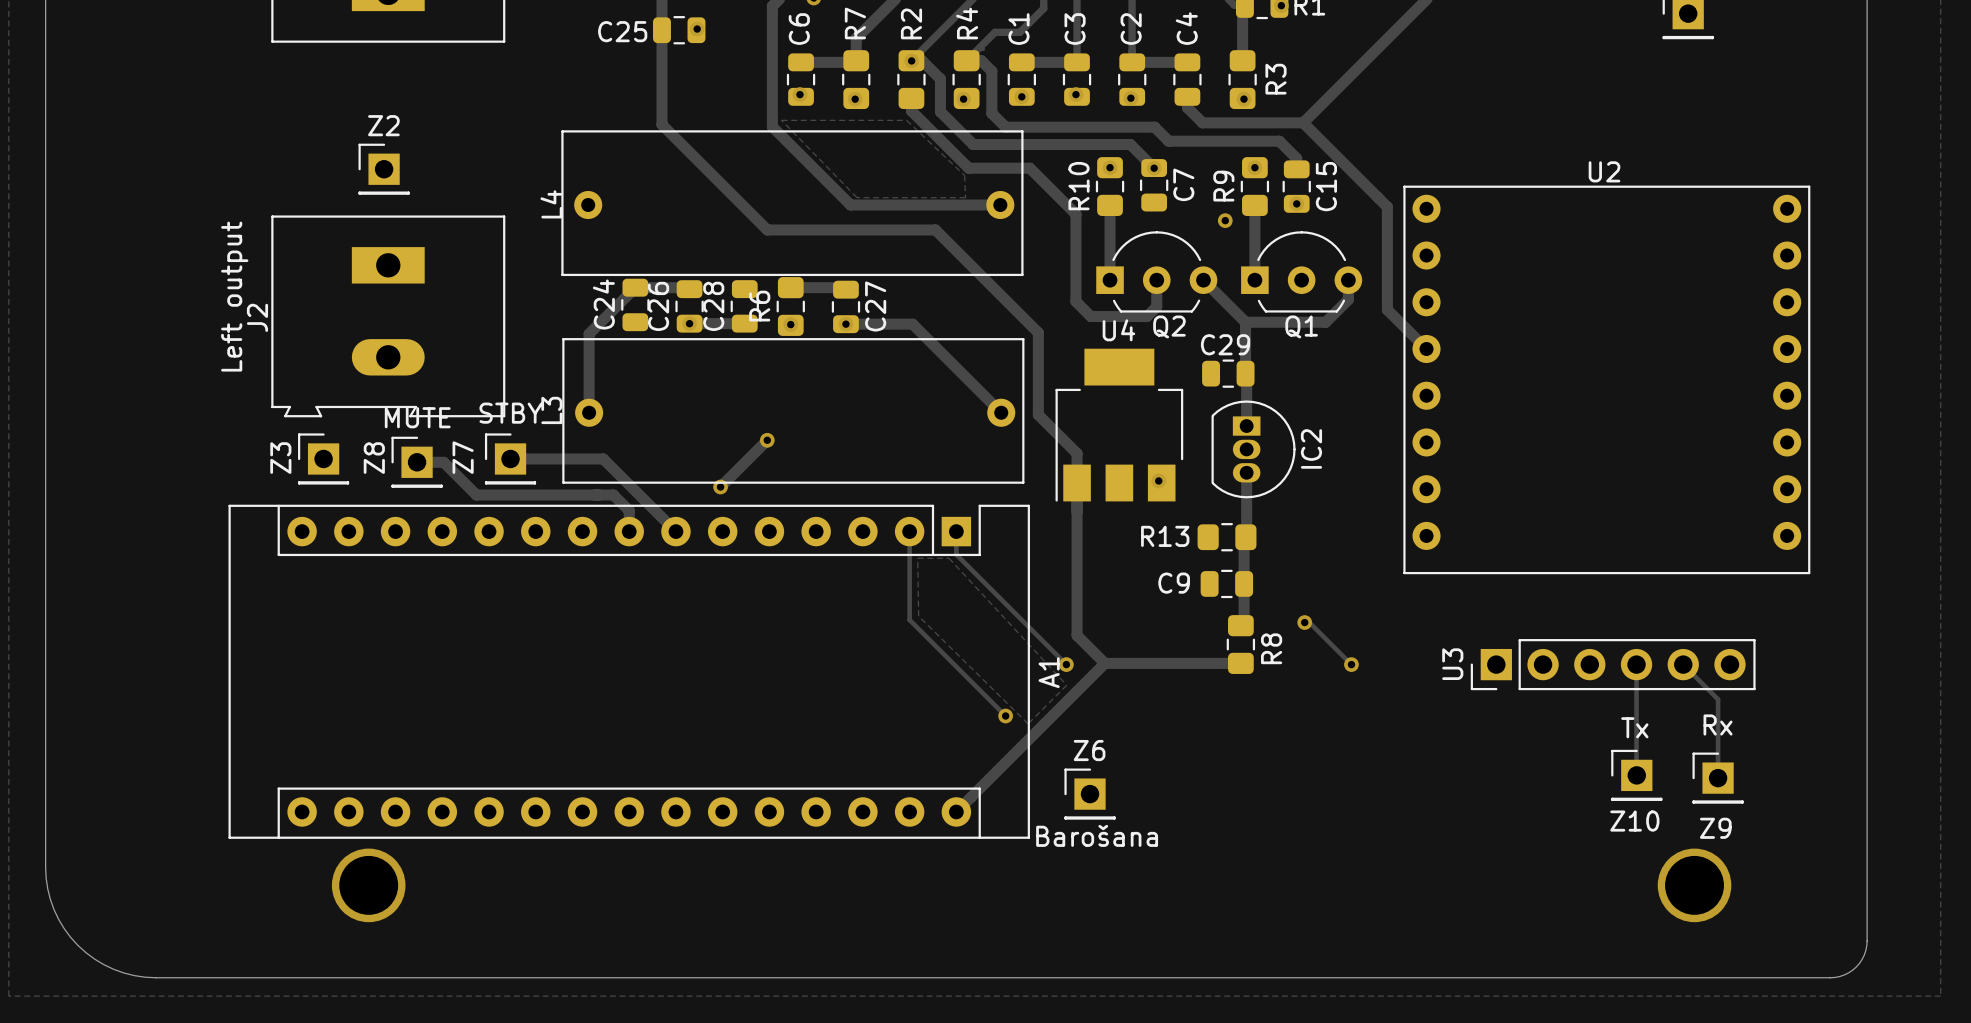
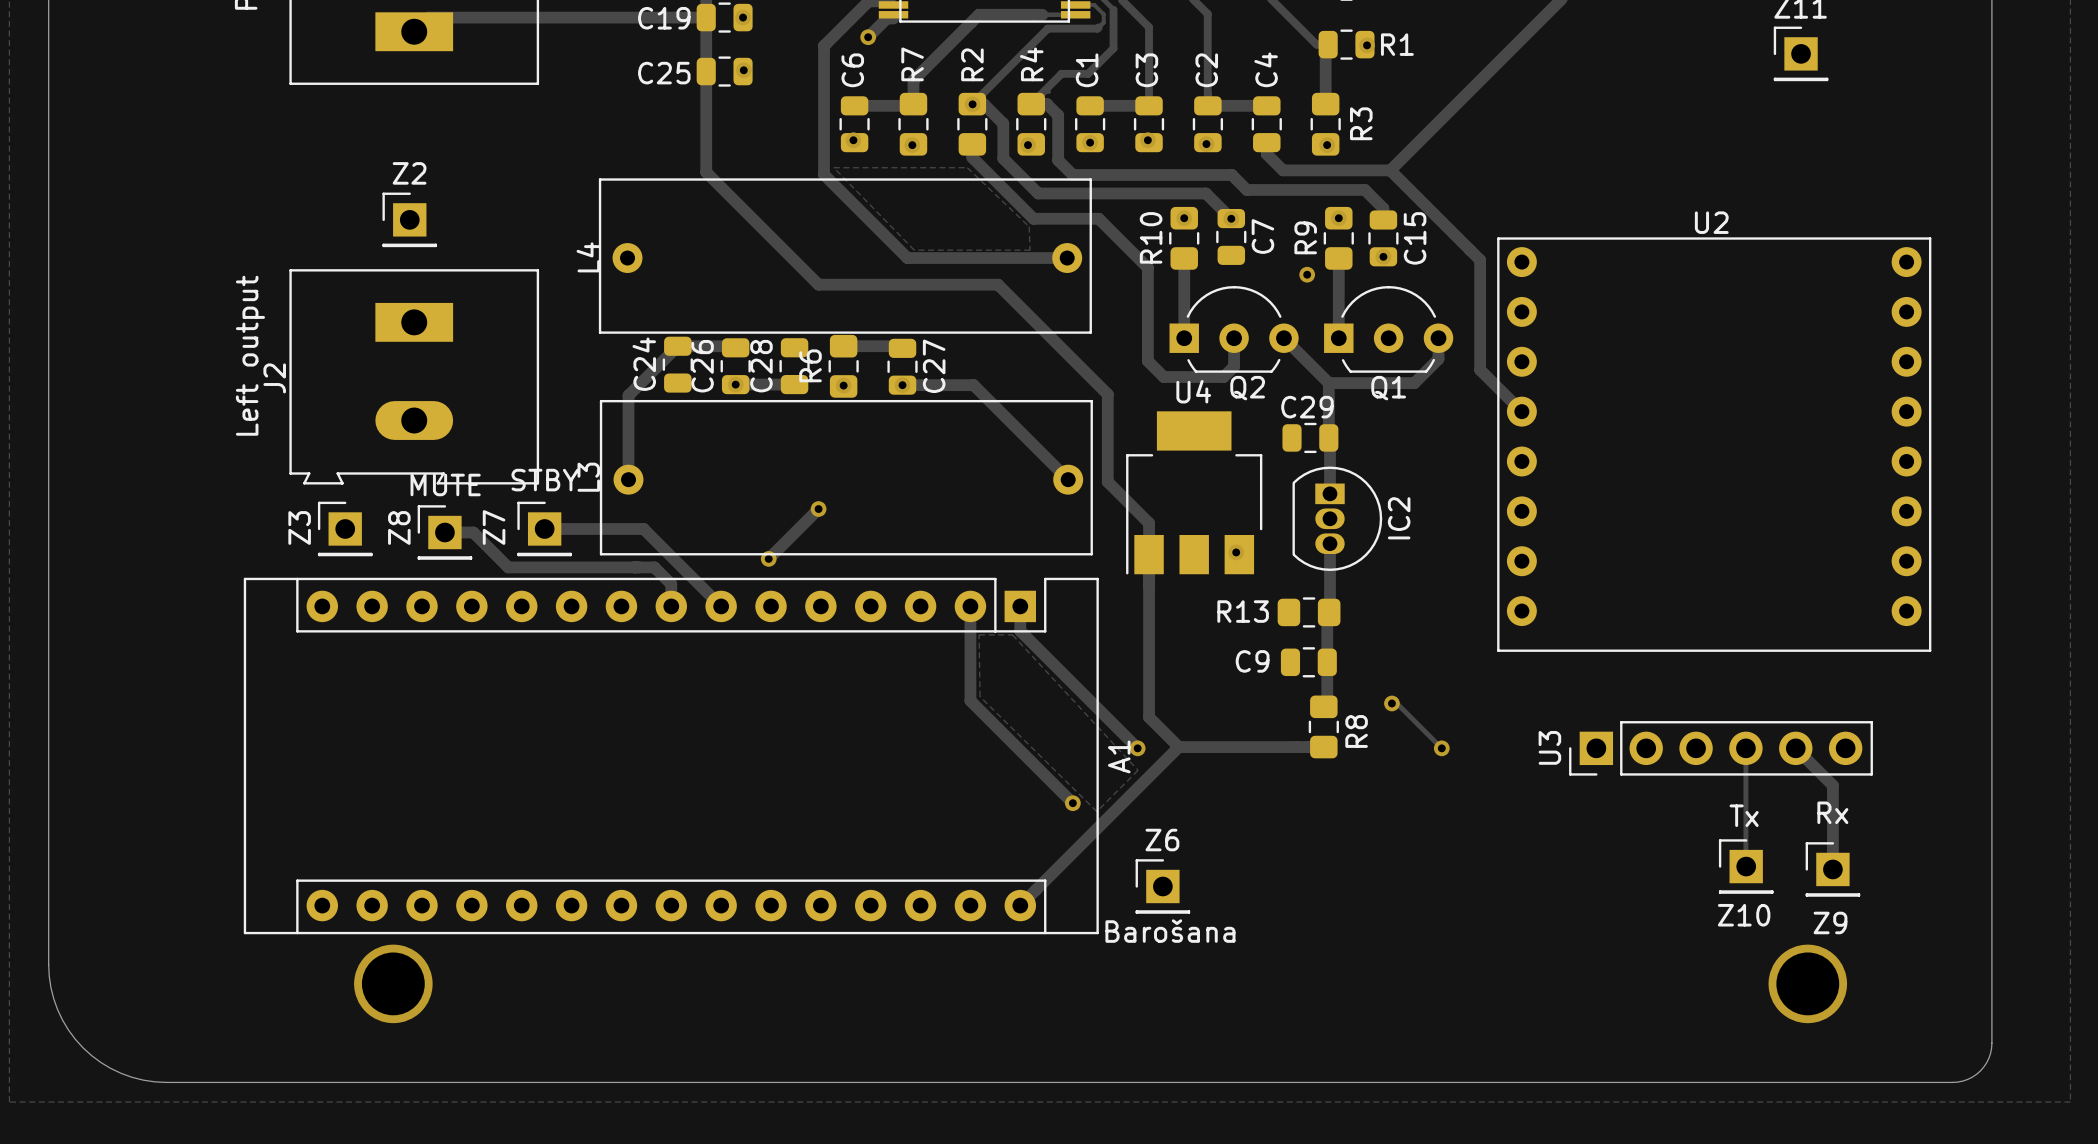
track width: thin (909, 531) (909, 620) (1005, 716) -> thick (970, 606) (970, 700) (1072, 803)
track width: thin (956, 531) (956, 554) (1066, 664) -> thick (1020, 606) (1020, 630) (1137, 748)
track width: thin (1683, 664) (1718, 699) (1718, 778) -> thick (1795, 748) (1832, 785) (1832, 869)

